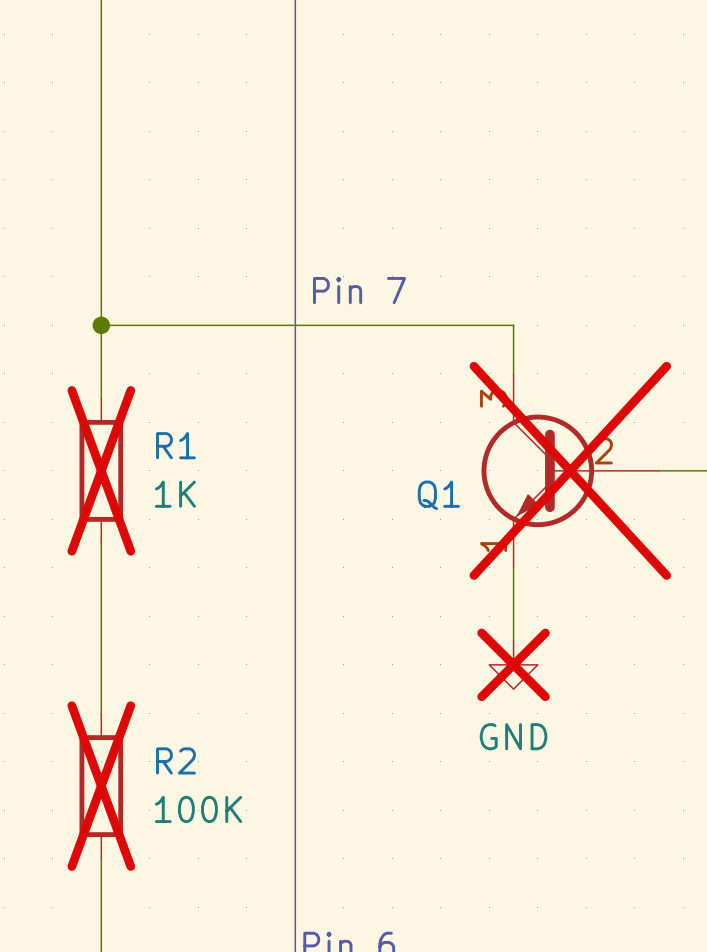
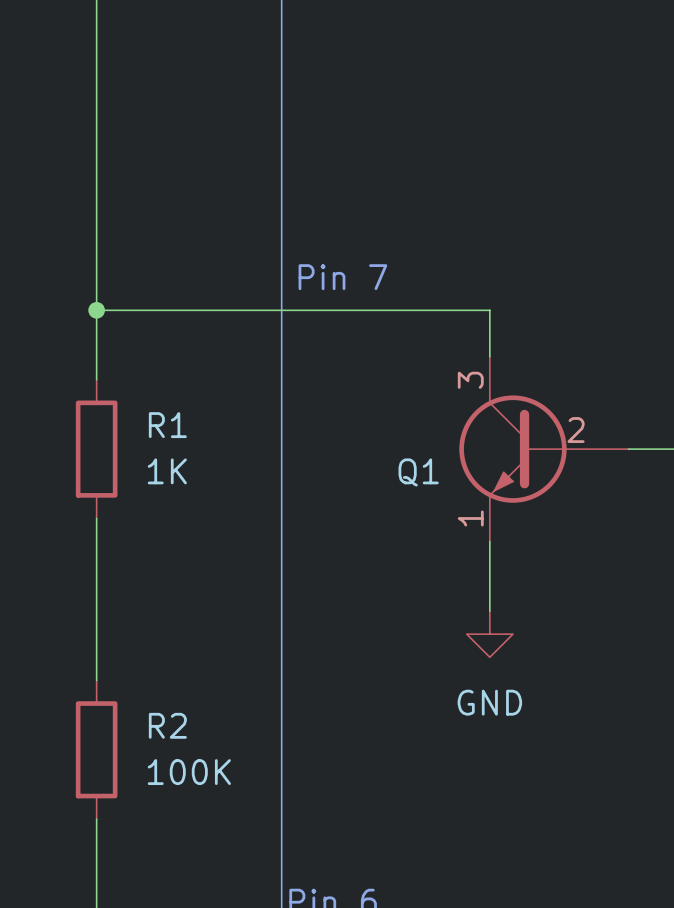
R1 do-not-place cross: (101, 470) -> none
Q1 do-not-place cross: (570, 470) -> none
power symbol do-not-place cross: (513, 664) -> none
R2 do-not-place cross: (101, 786) -> none

